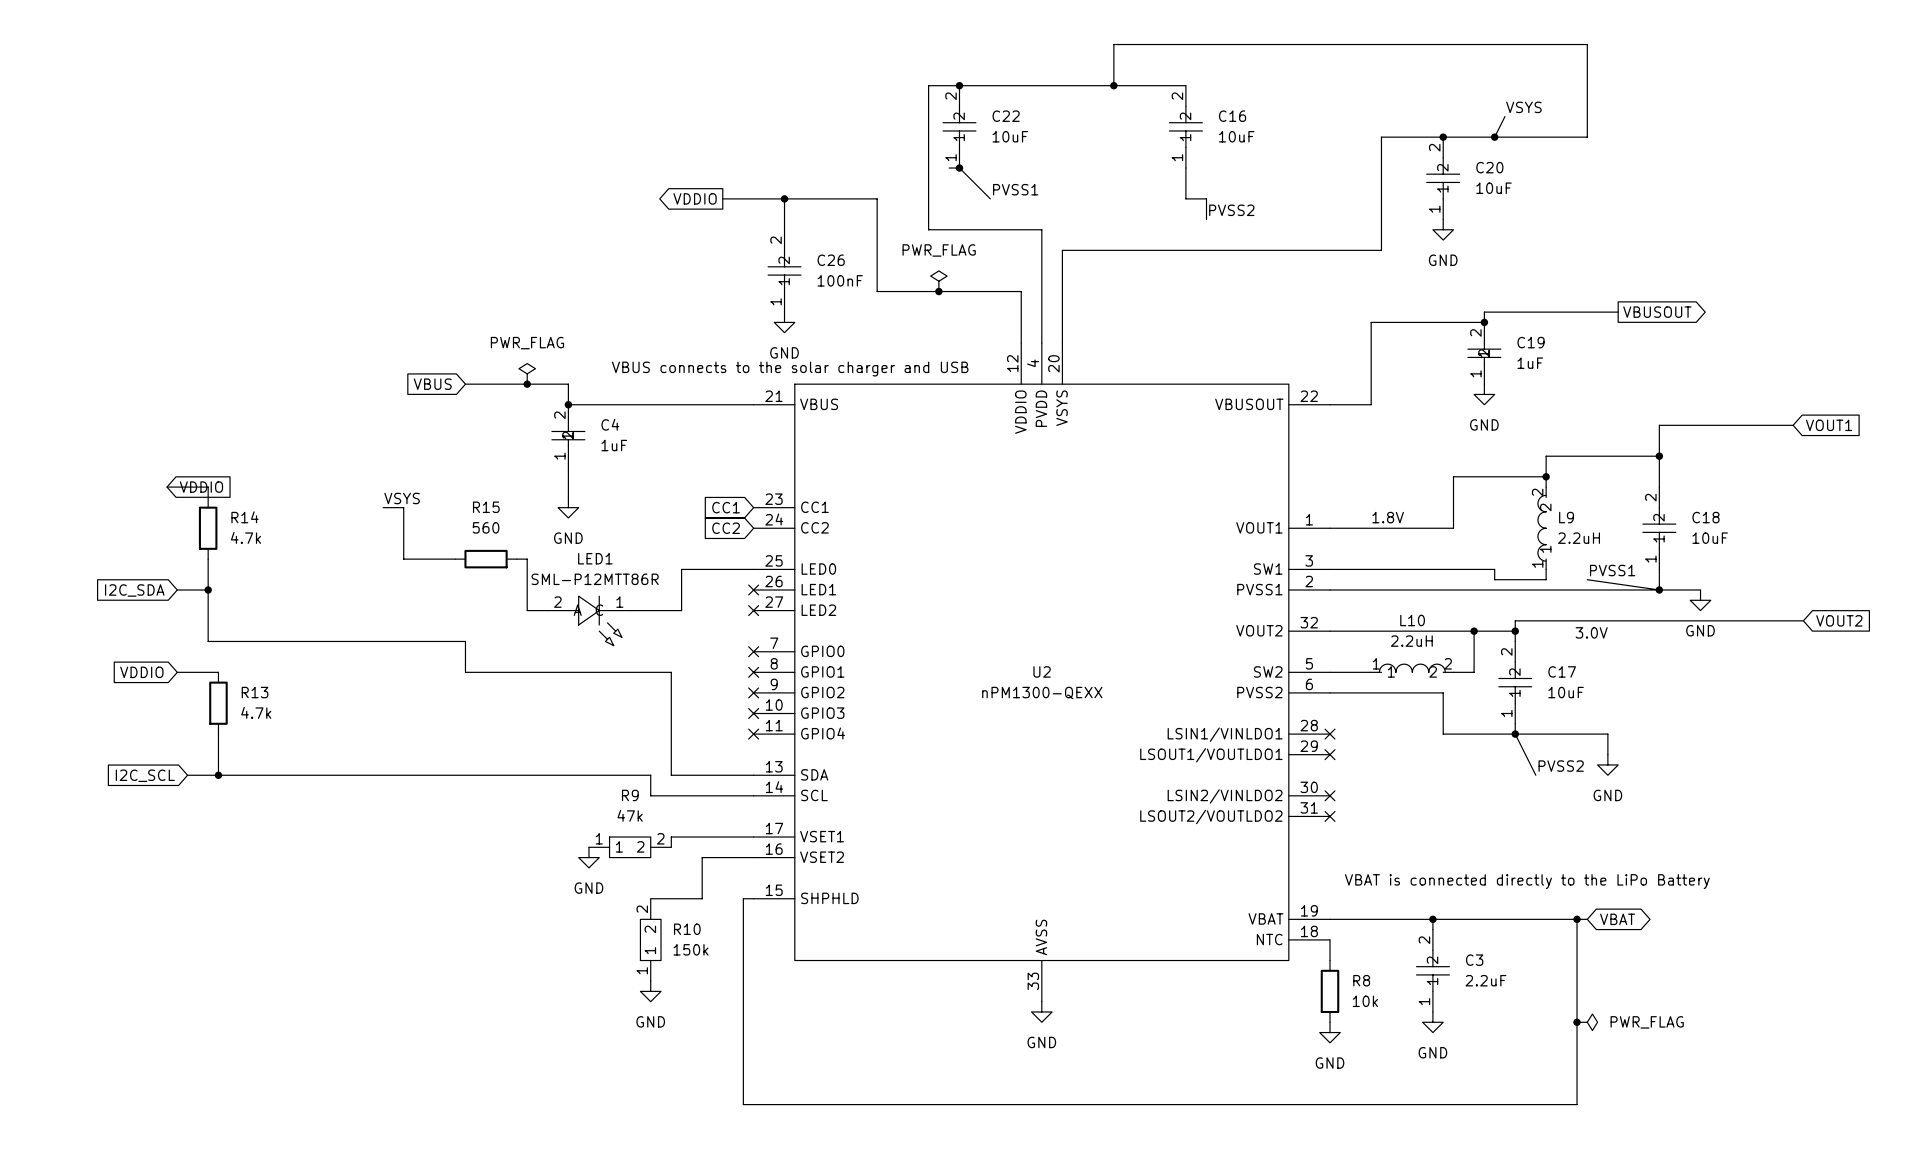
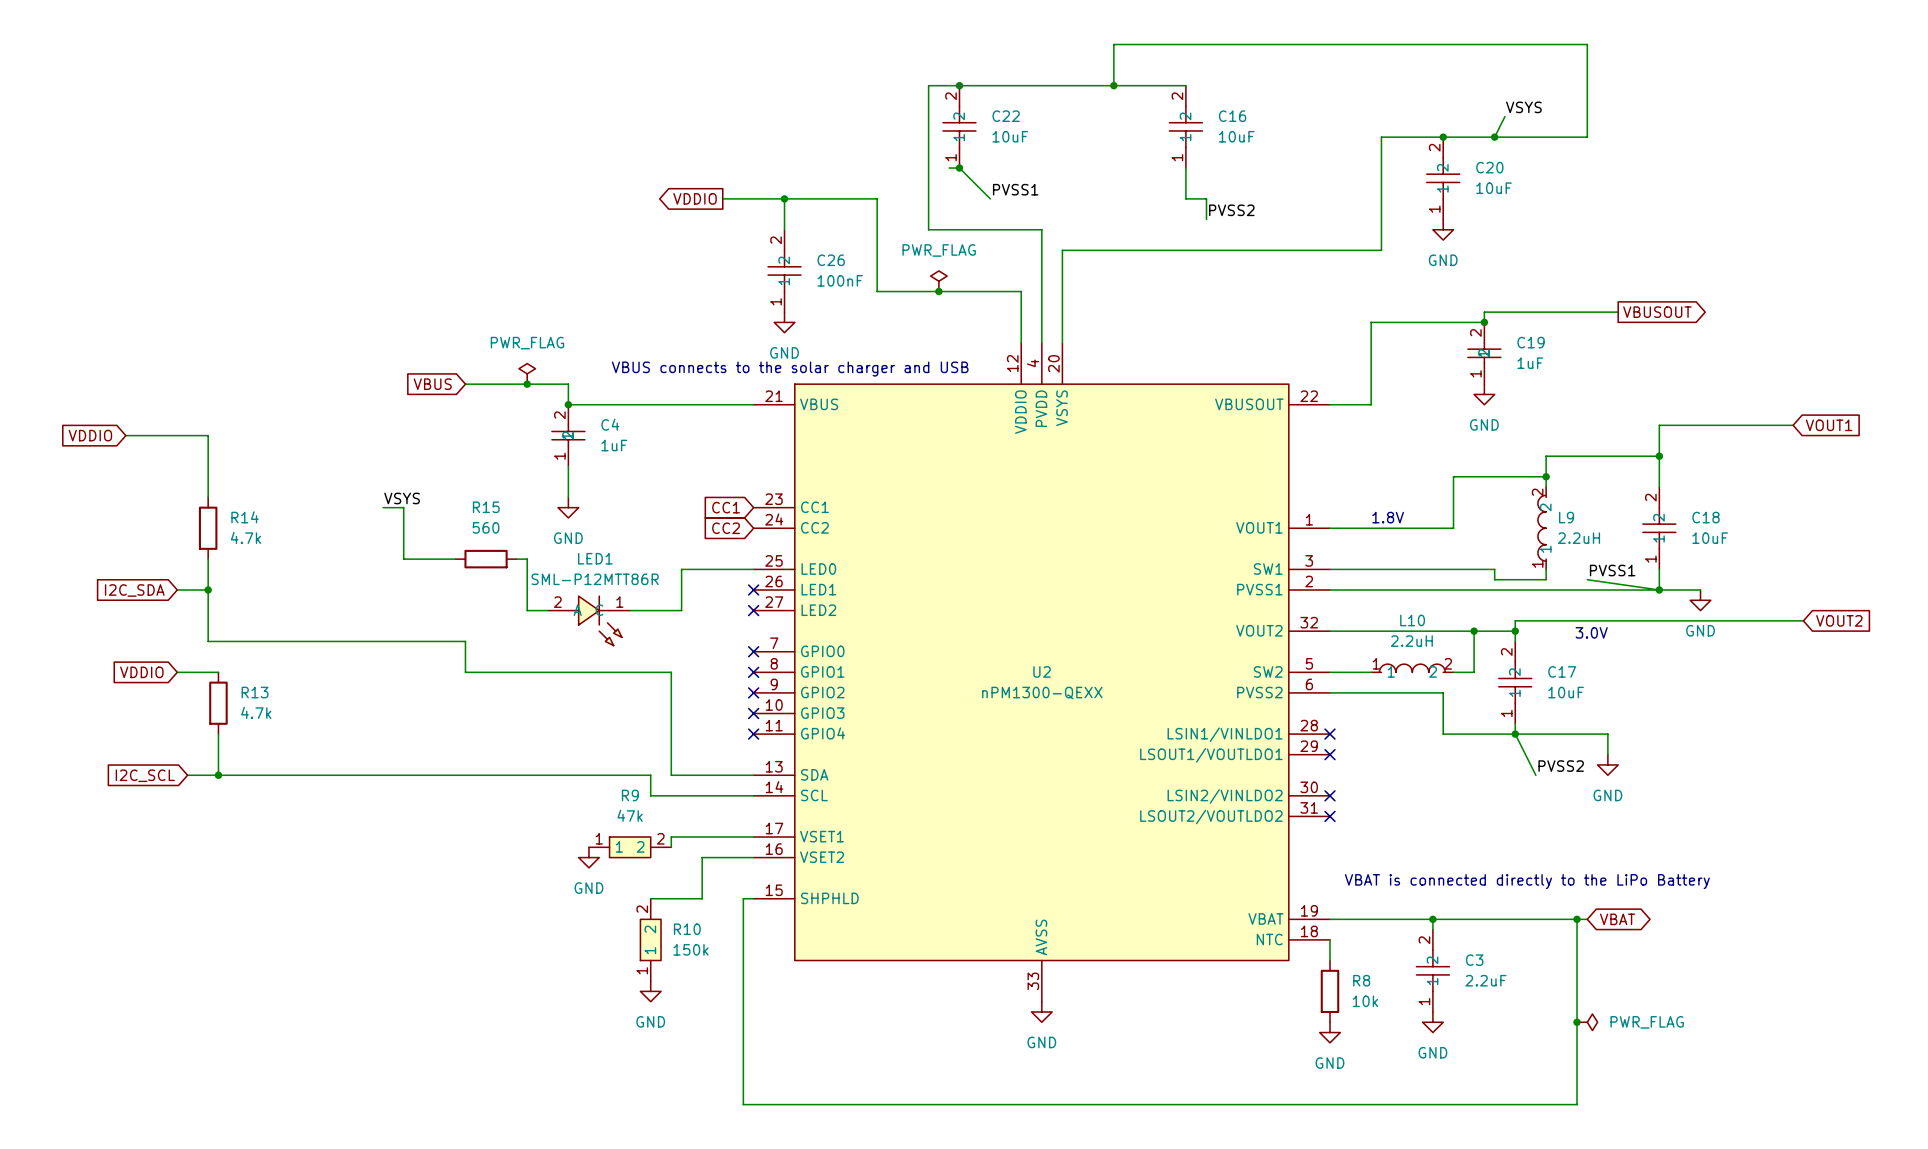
wire: (166, 487) (208, 487) -> (125, 435) (208, 435) (208, 487)
global label rotation: 0° (201, 487) -> 180° (90, 435)
global label position: VDDIO (201, 487) -> VDDIO (90, 435)

